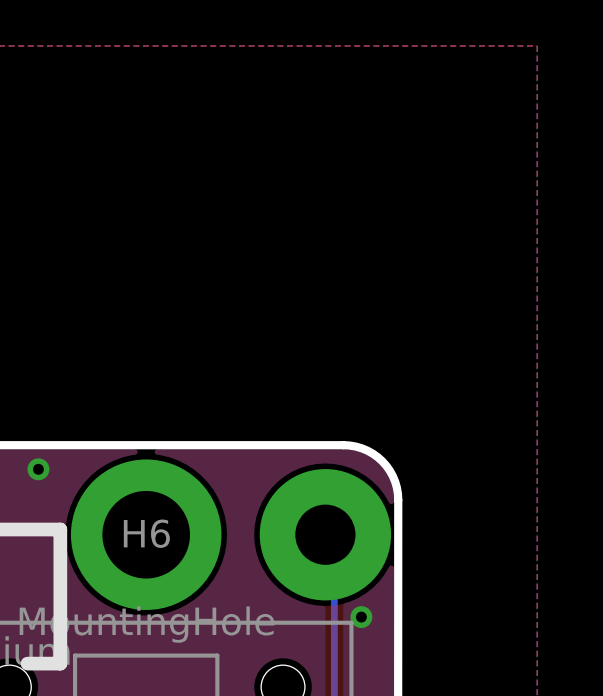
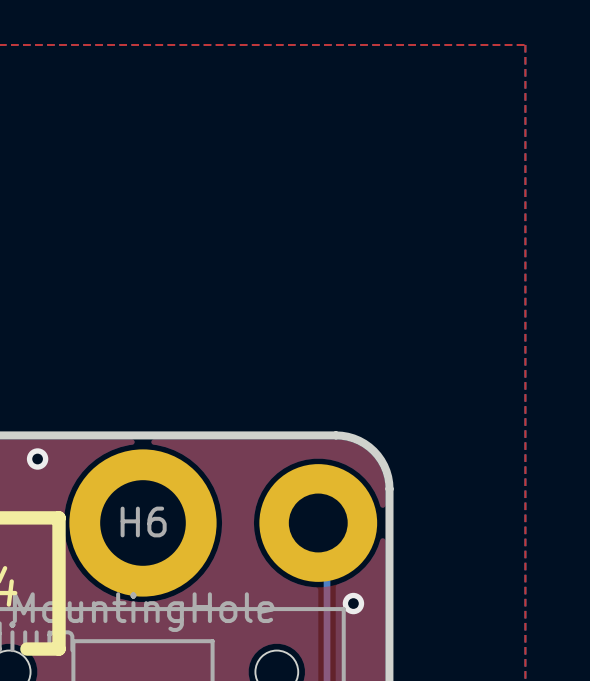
part footprint: [259, 469, 392, 601] -> [259, 464, 378, 582]

